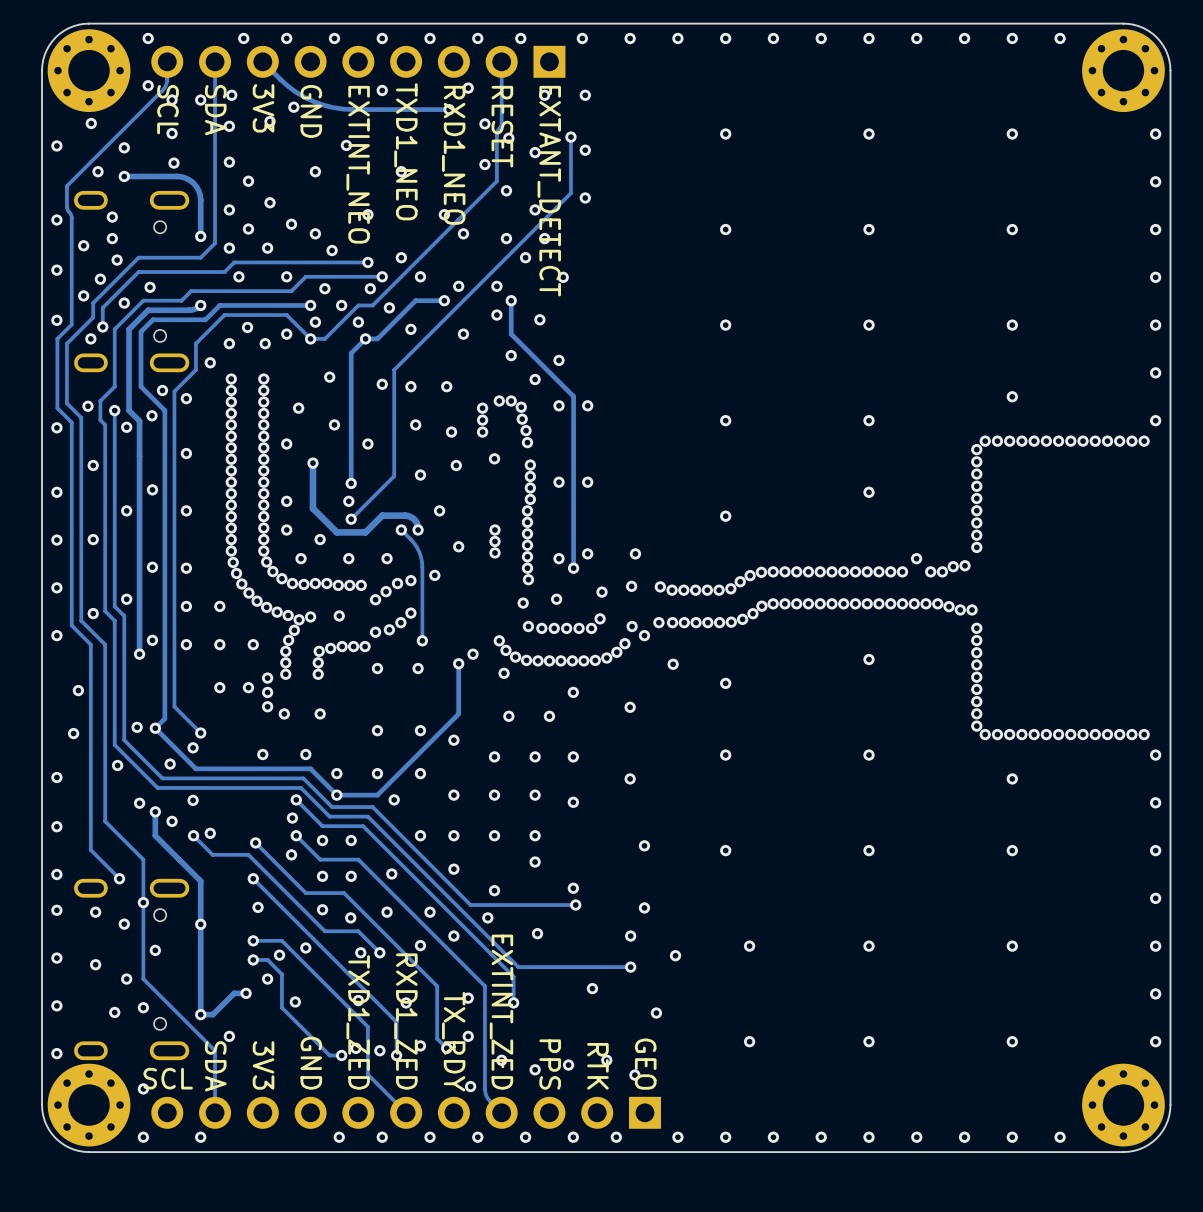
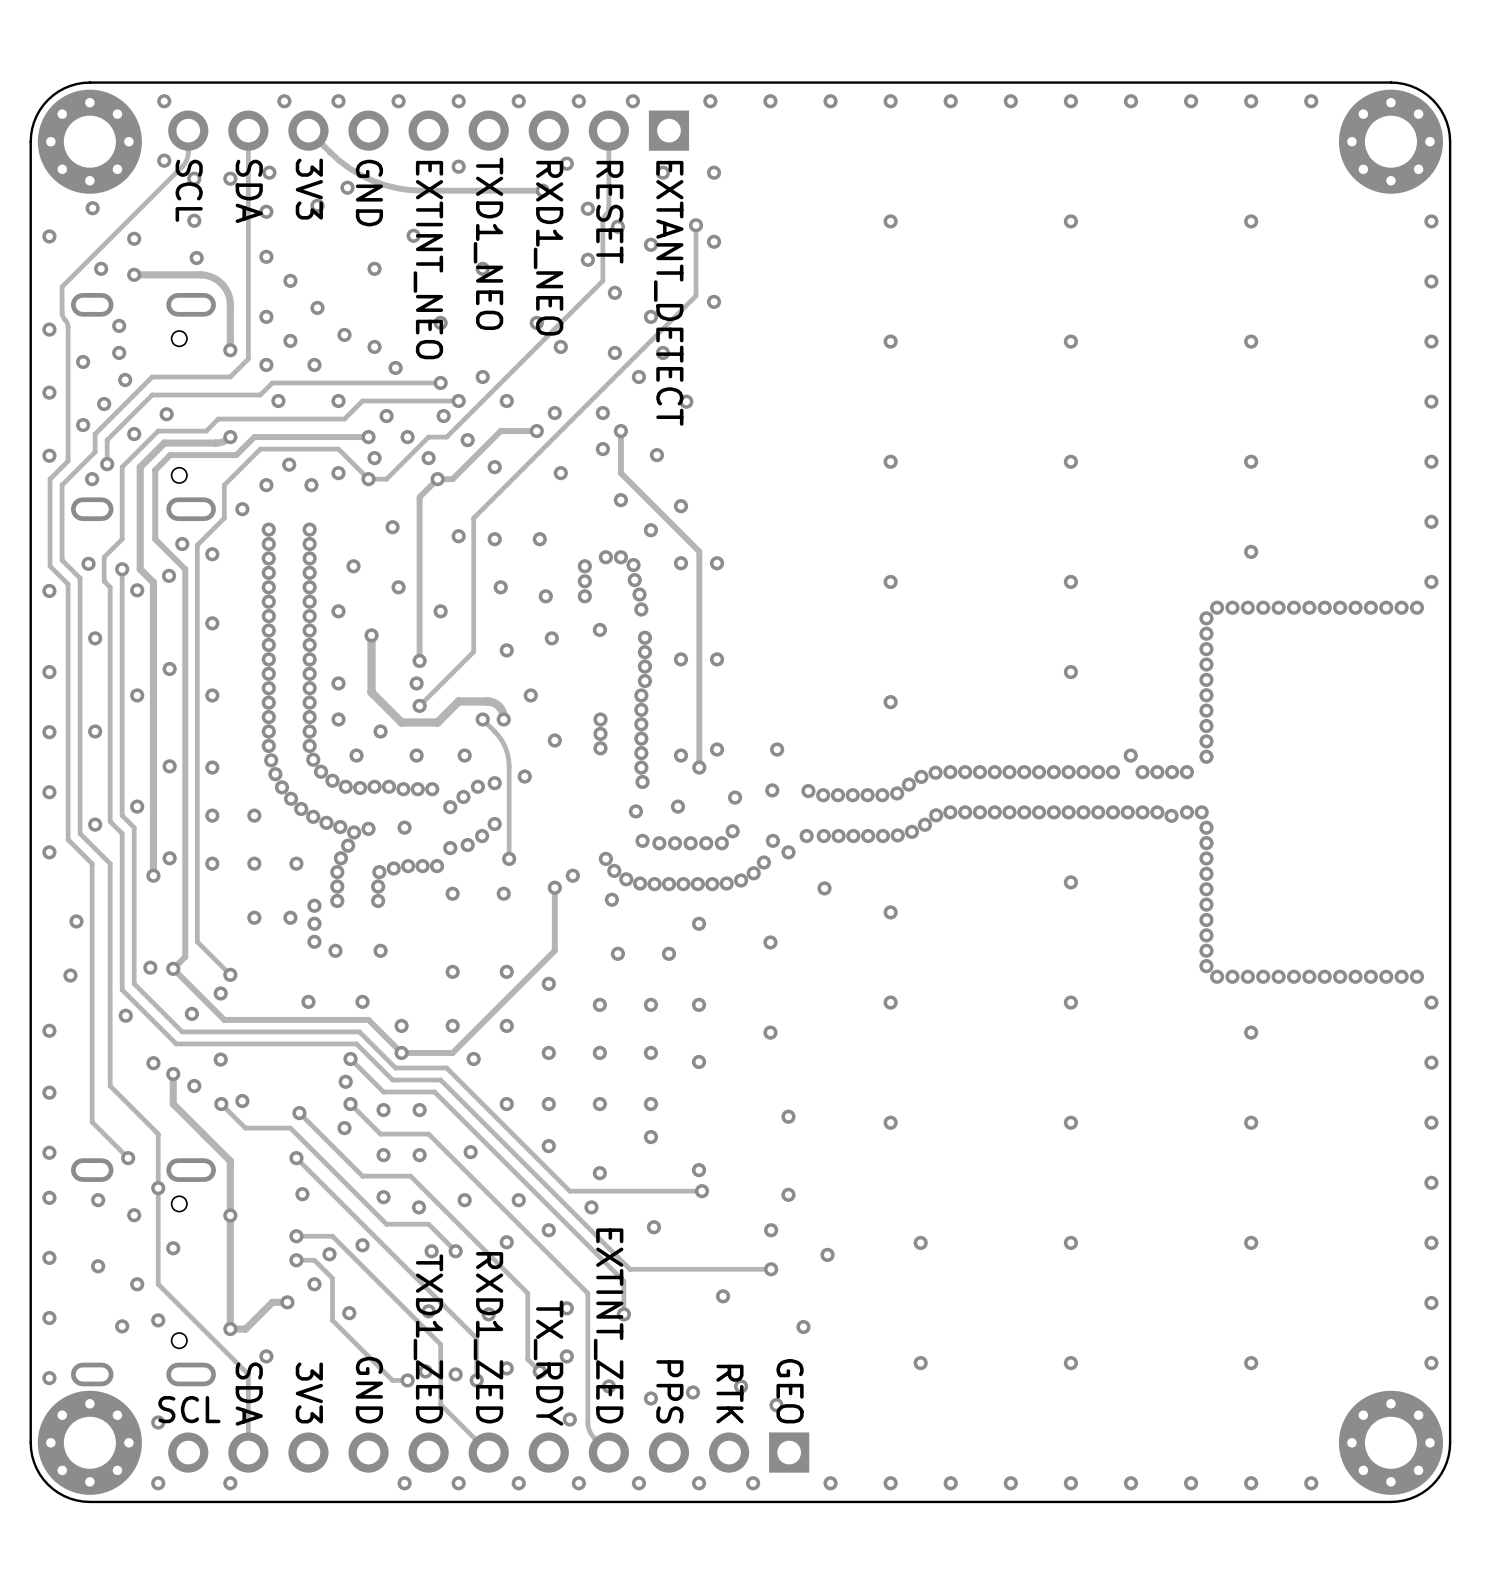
via: none -> (1206, 756)
via: (965, 565) -> none
via: (953, 566) -> none
via: none -> (1142, 772)
via: (930, 571) -> none
via: none -> (1157, 772)
via: (942, 571) -> none
via: none -> (1172, 772)
via: none -> (1186, 772)
via: none -> (1186, 812)
via: none -> (1201, 812)
via: (960, 609) -> none
via: (972, 609) -> none
via: none -> (1206, 827)

